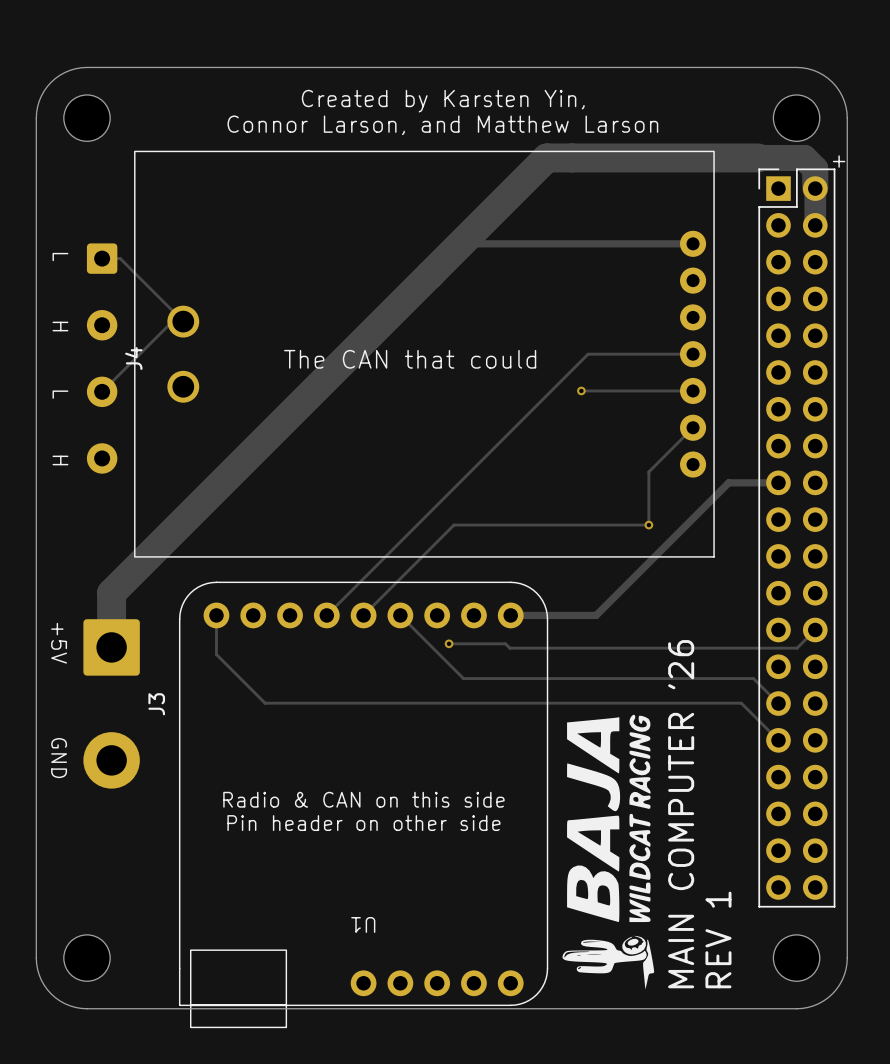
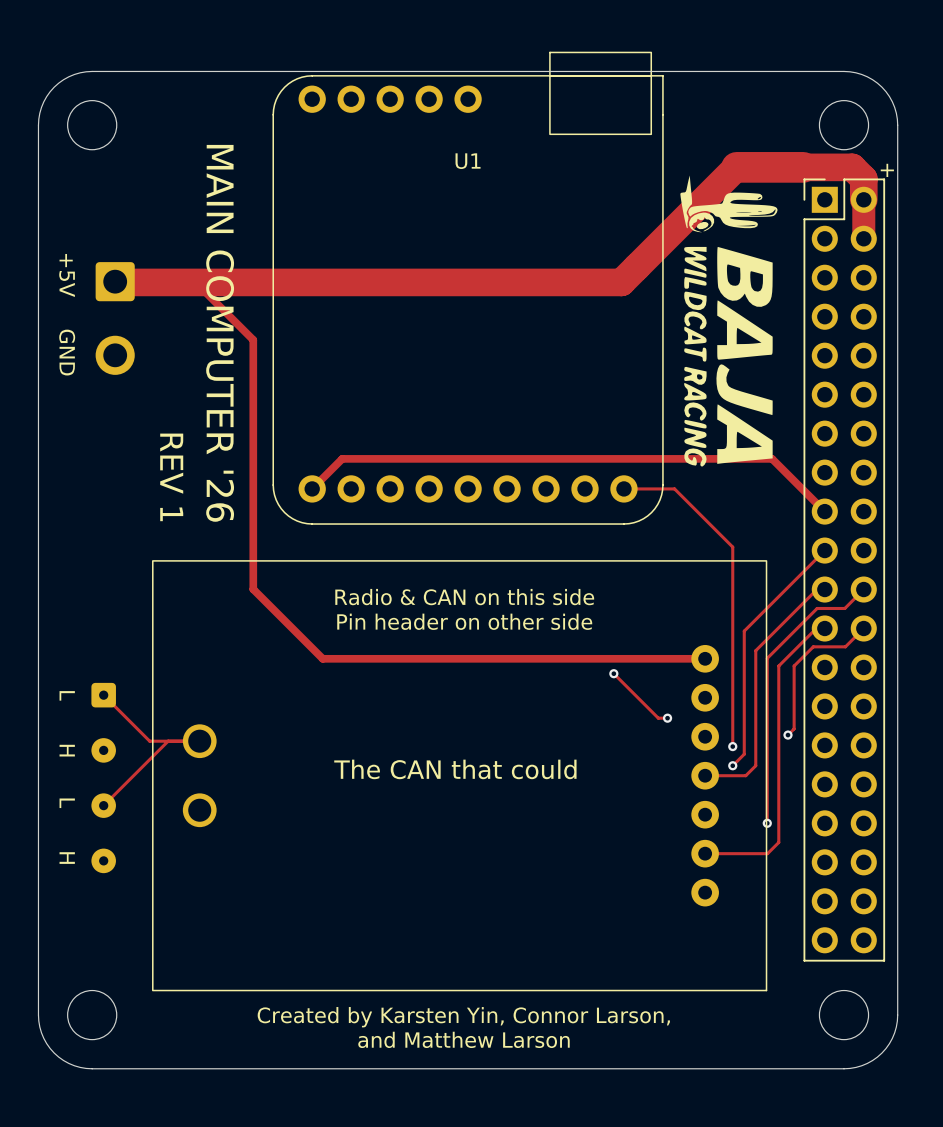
text: Created by Karsten Yin, (443, 101) -> none
text: Connor Larson, and Matthew Larson (442, 125) -> none
track: (695, 157) (546, 157) (111, 593) (111, 647) -> (736, 167) (621, 282) (122, 282)
drawing: none -> [680, 175, 778, 467]
track: (693, 243) (460, 243) (430, 274) -> none
text: L (60, 257) -> +5V (67, 275)
track: (102, 258) (120, 258) (183, 321) (172, 321) (102, 391) -> none
track: none -> (191, 282) (195, 282) (253, 339) (253, 589) (322, 658) (705, 658)
text: none -> MAIN COMPUTER '26 (220, 333)
part: none -> (115, 318)
text: H (60, 326) -> GND (67, 352)
part: (424, 354) -> none
track: (693, 354) (588, 354) (326, 615) -> none
J4: (102, 358) -> none
text: The CAN that could (410, 359) -> none
track: (581, 390) (693, 390) -> none
via: (581, 390) -> none
text: L (60, 394) -> none
track: (693, 427) (648, 471) (648, 525) (453, 525) (363, 615) -> none
text: none -> REV 1 (171, 477)
text: H (60, 460) -> none
track: none -> (623, 488) (674, 488) (732, 547) (732, 746)
track: (778, 482) (728, 482) (596, 615) (510, 615) -> (824, 511) (772, 458) (342, 458) (312, 488)
track: none -> (824, 550) (744, 631) (744, 754) (732, 765)
via: (648, 525) -> none
track: none -> (824, 589) (816, 589) (755, 650) (755, 765) (745, 775) (705, 775)
track: none -> (863, 589) (844, 608) (817, 608) (767, 658) (767, 823)
track: none -> (816, 628) (778, 666) (778, 842) (767, 853) (705, 853)
track: none -> (863, 628) (845, 646) (813, 646) (794, 666) (794, 728) (787, 735)
track: (216, 615) (216, 654) (265, 703) (741, 703) (778, 740) -> none
track: (400, 615) (463, 678) (753, 678) (778, 703) -> none
track: (815, 629) (797, 648) (509, 648) (505, 643) (449, 643) -> none
track: none -> (613, 673) (658, 718) (667, 718)
via: none -> (613, 673)
text: +5V (59, 643) -> none
via: (449, 643) -> none
track: none -> (103, 695) (149, 741) (199, 741)
text: none -> L (67, 695)
via: none -> (667, 718)
via: none -> (787, 735)
track: none -> (168, 741) (103, 805)
J3: (111, 703) -> none
via: none -> (732, 746)
text: none -> H (67, 750)
drawing: [562, 714, 655, 990] -> none
via: none -> (732, 765)
text: none -> The CAN that could (455, 769)
part: none -> (459, 775)
part: none -> (103, 778)
text: GND (59, 758) -> none
text: none -> L (67, 803)
via: none -> (767, 823)
text position: Radio & CAN on this side (363, 799) -> Radio & CAN on this side (464, 597)
U1 rotation: 0° (363, 804) -> 180° (468, 288)
U1 position: (363, 804) -> (468, 288)
text: none -> H (67, 858)
text: MAIN COMPUTER '26 (681, 814) -> none
text position: Pin header on other side (363, 823) -> Pin header on other side (464, 621)
text: REV 1 (718, 939) -> none
text: none -> Created by Karsten Yin, Connor Larson, (463, 1017)
text: none -> and Matthew Larson (463, 1039)

